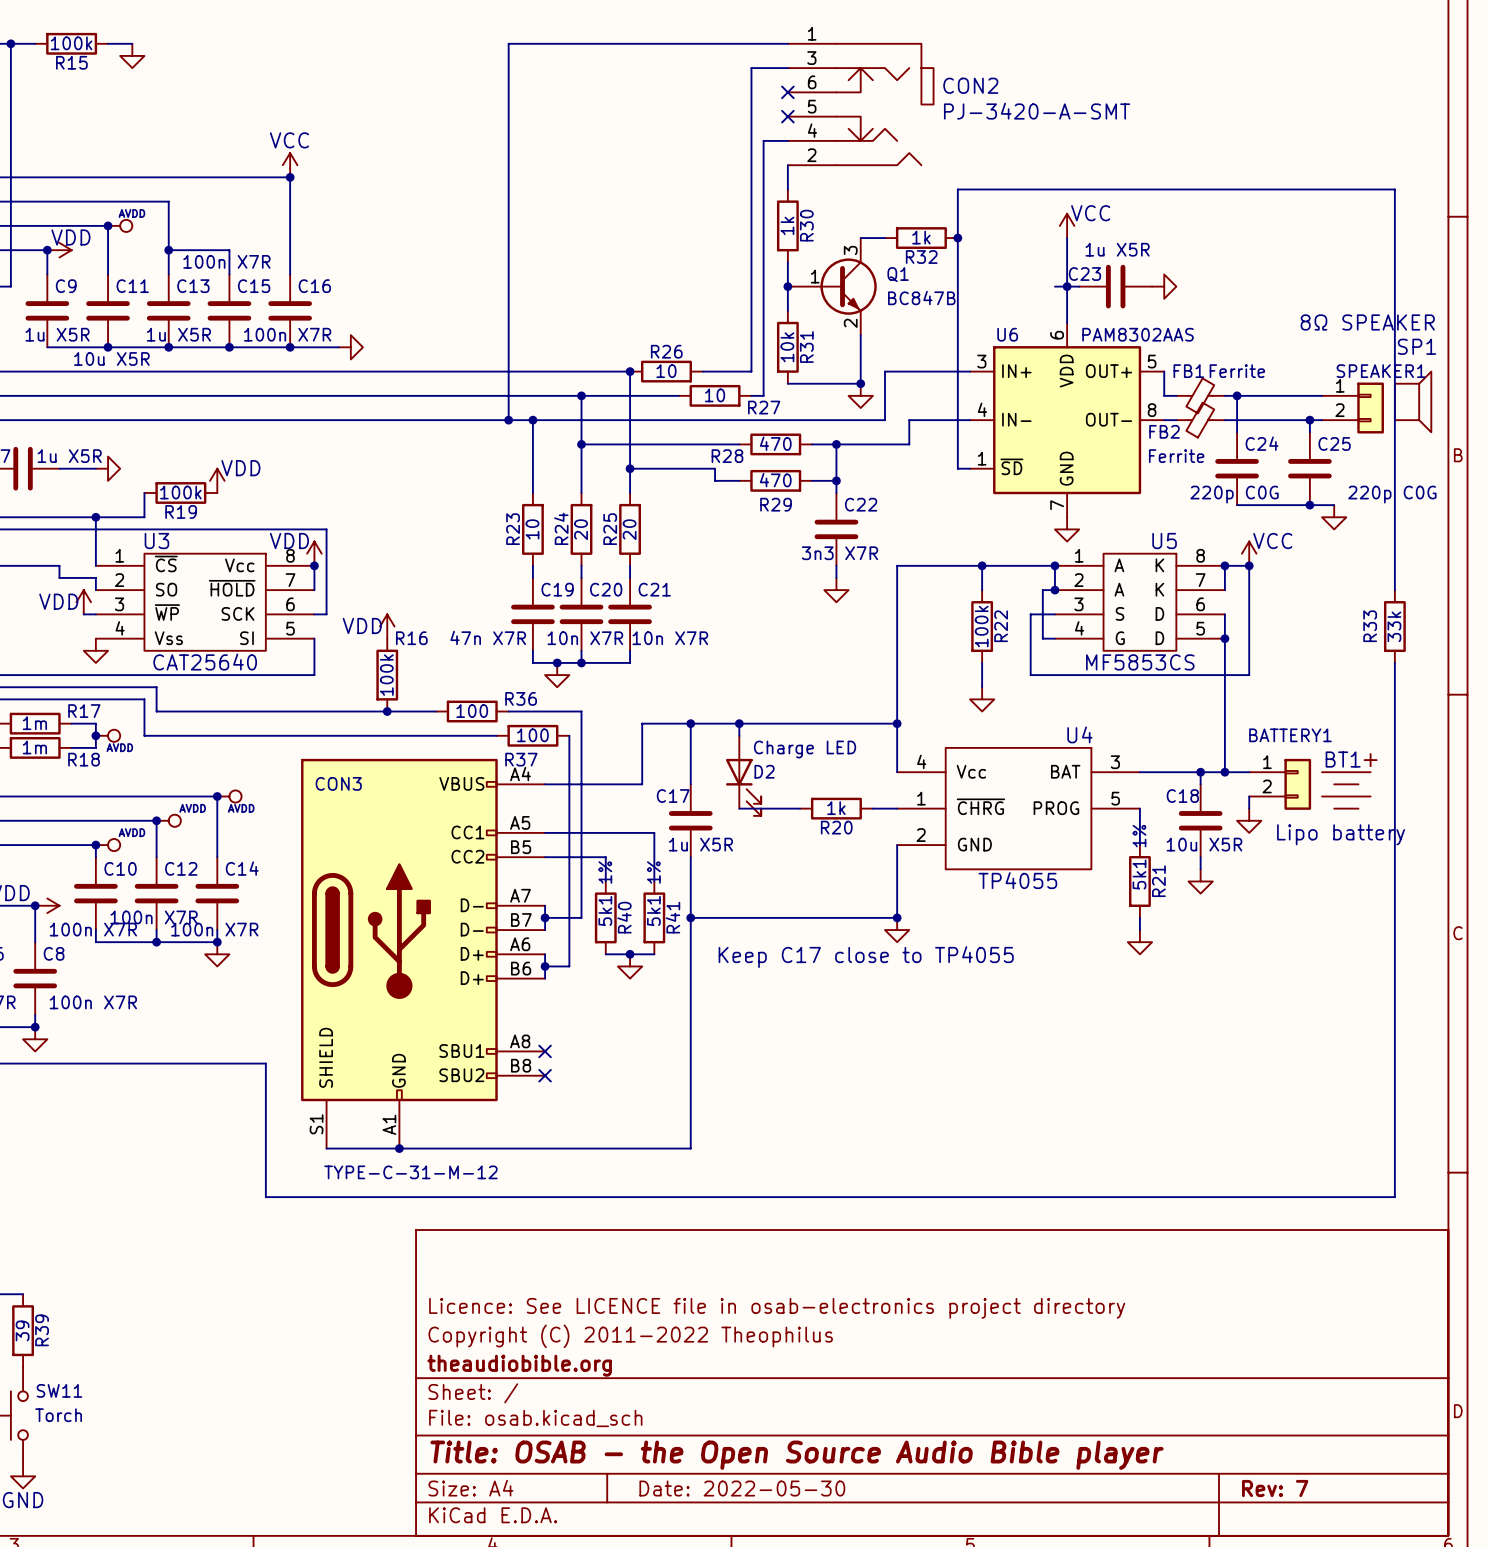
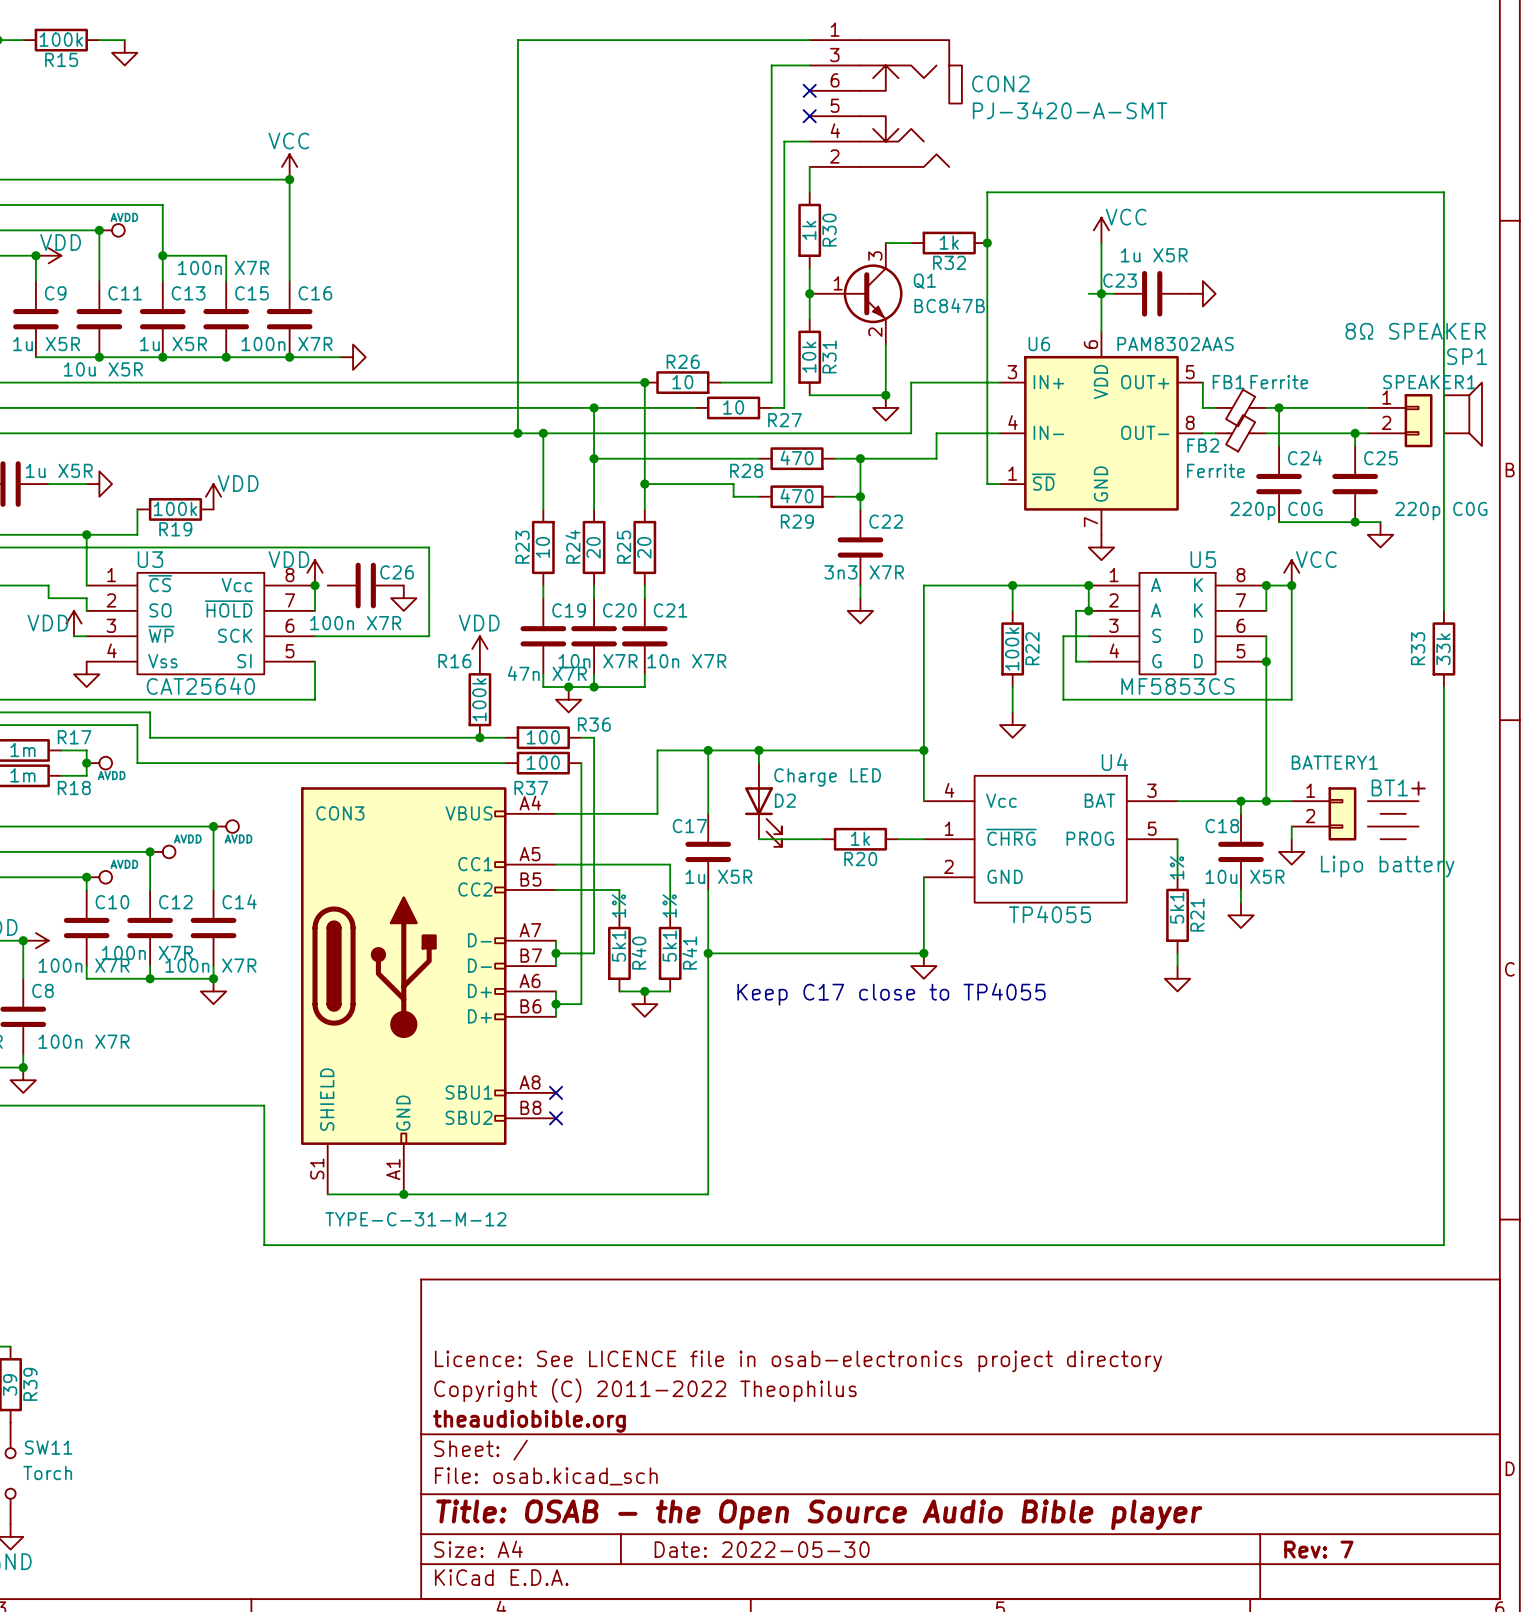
wire: (326, 529) (326, 614) -> (327, 547) (429, 547) (429, 636) (327, 636)
C26: none -> 100n X7R (365, 585)
power symbol: none -> (403, 598)
power symbol text position: VDD (362, 625) -> VDD (479, 623)
power symbol position: VDD (387, 626) -> VDD (479, 648)
C19 value position: 47n X7R (488, 637) -> 47n X7R (547, 673)
R16 name position: R16 (411, 638) -> R16 (454, 661)
R16 position: (387, 675) -> (479, 699)
junction: (387, 711) -> none
junction: none -> (479, 737)
R36 position: (472, 711) -> (543, 737)
wire: (508, 711) (569, 711) -> (441, 737) (505, 737)

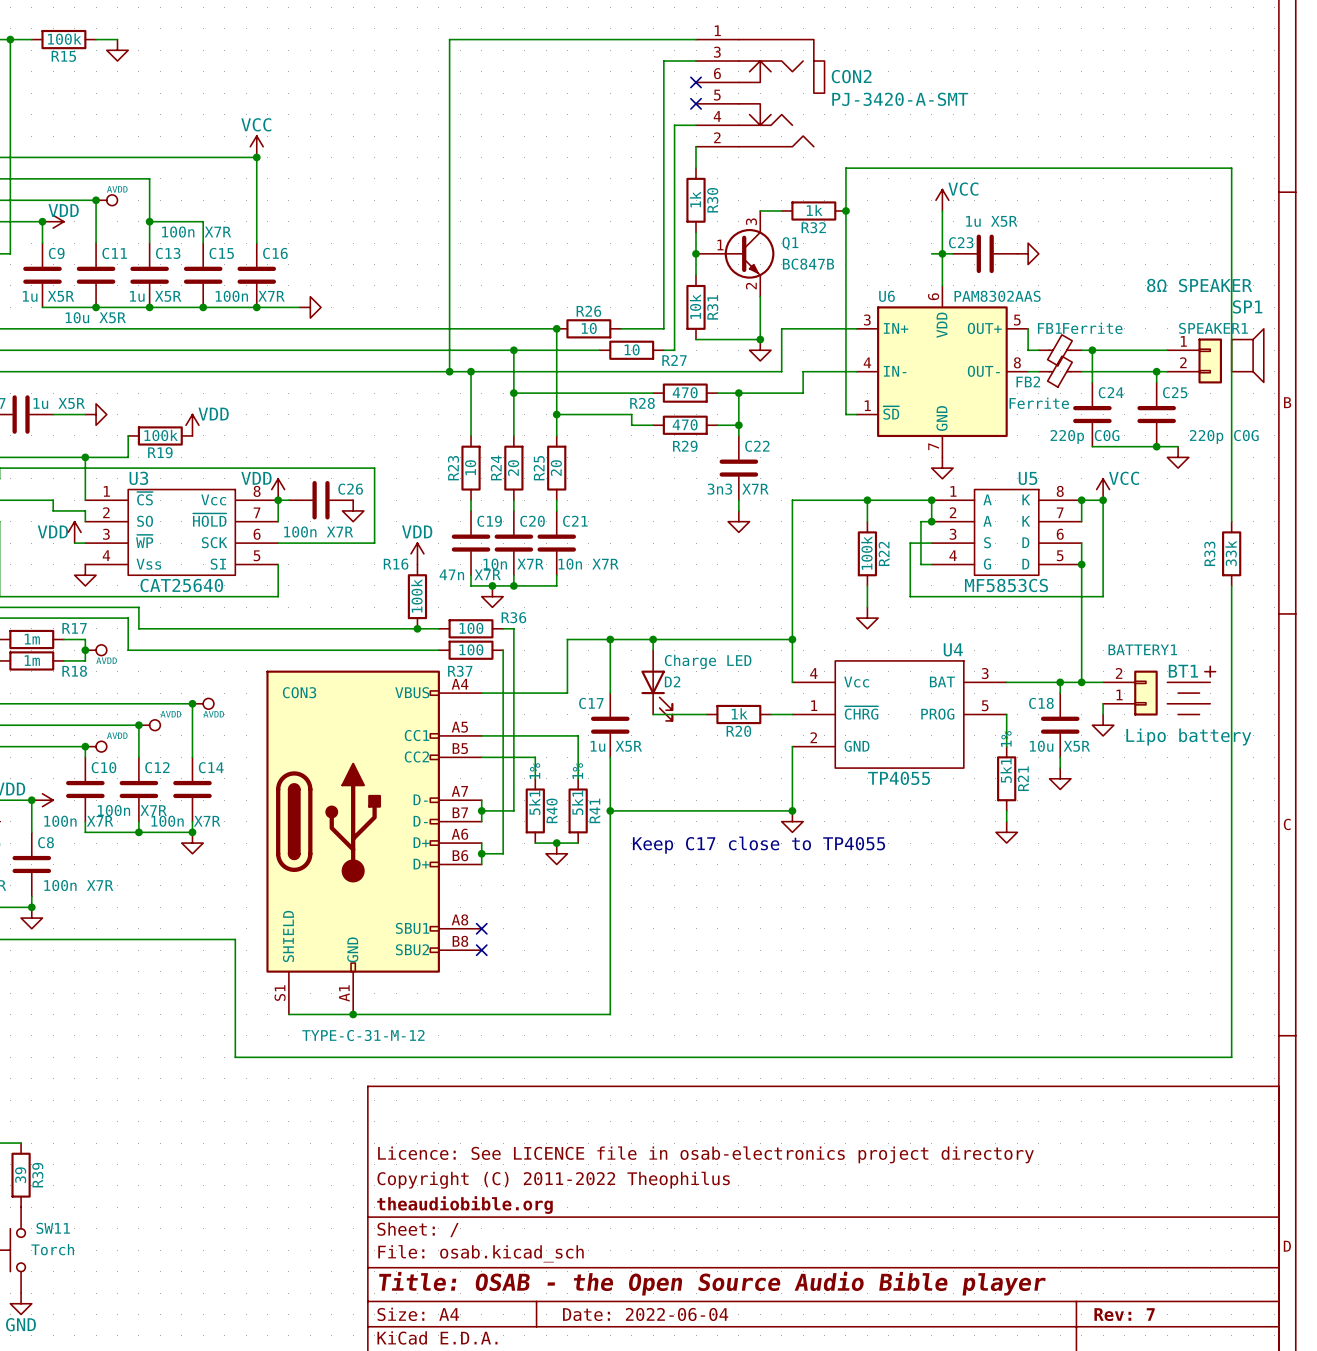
wire: none -> (278, 500) (288, 500)
BATTERY1 flip: as is (1342, 813) -> up-down (1145, 693)
title block: Date: 2022-05-30 (762, 1549) -> Date: 2022-06-04 (645, 1314)

